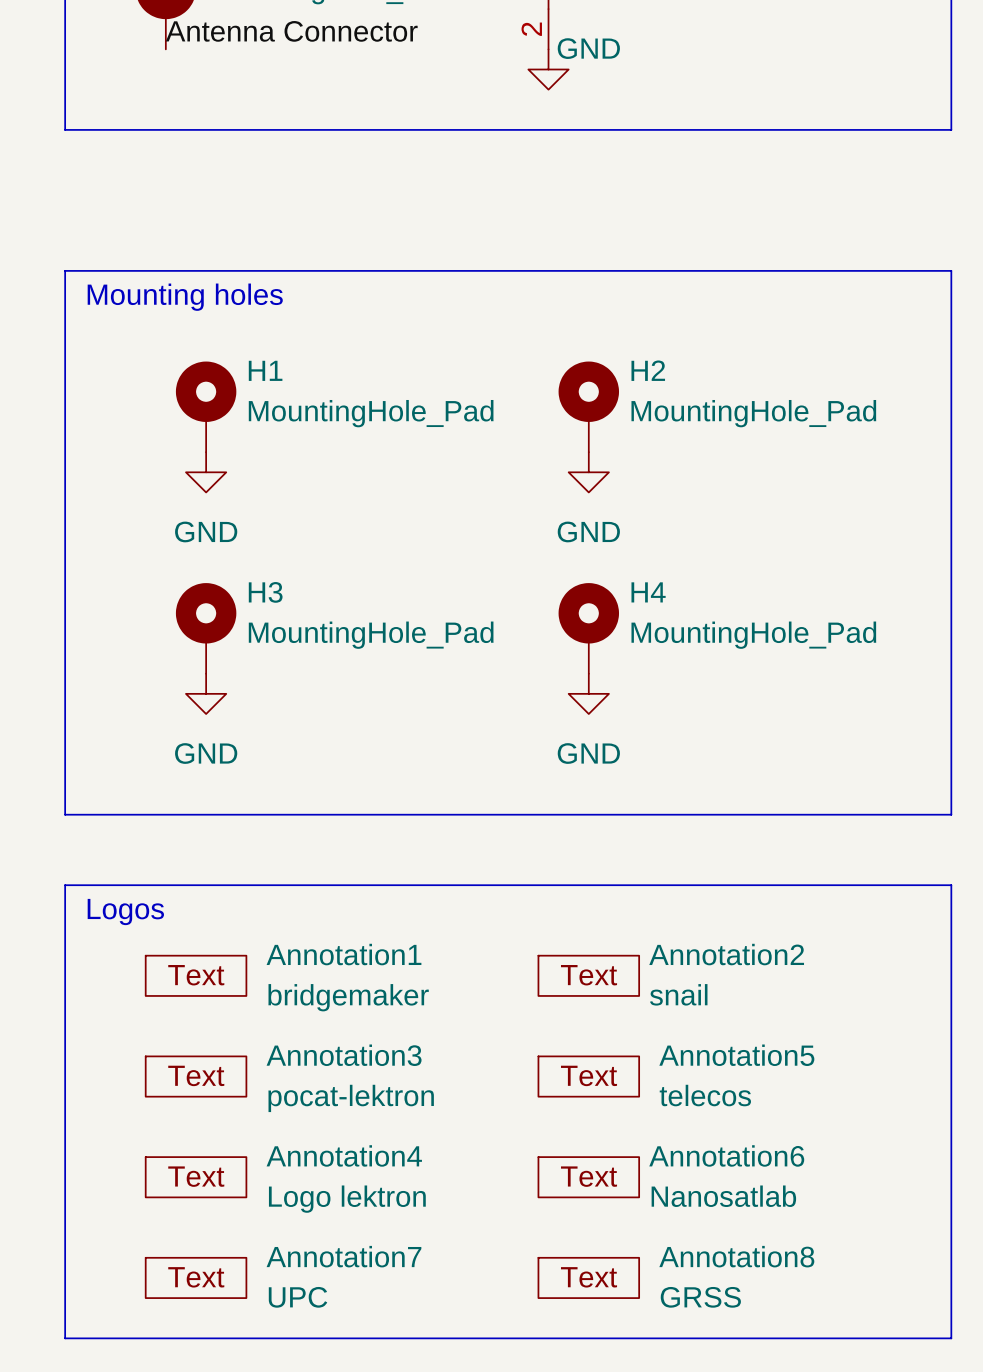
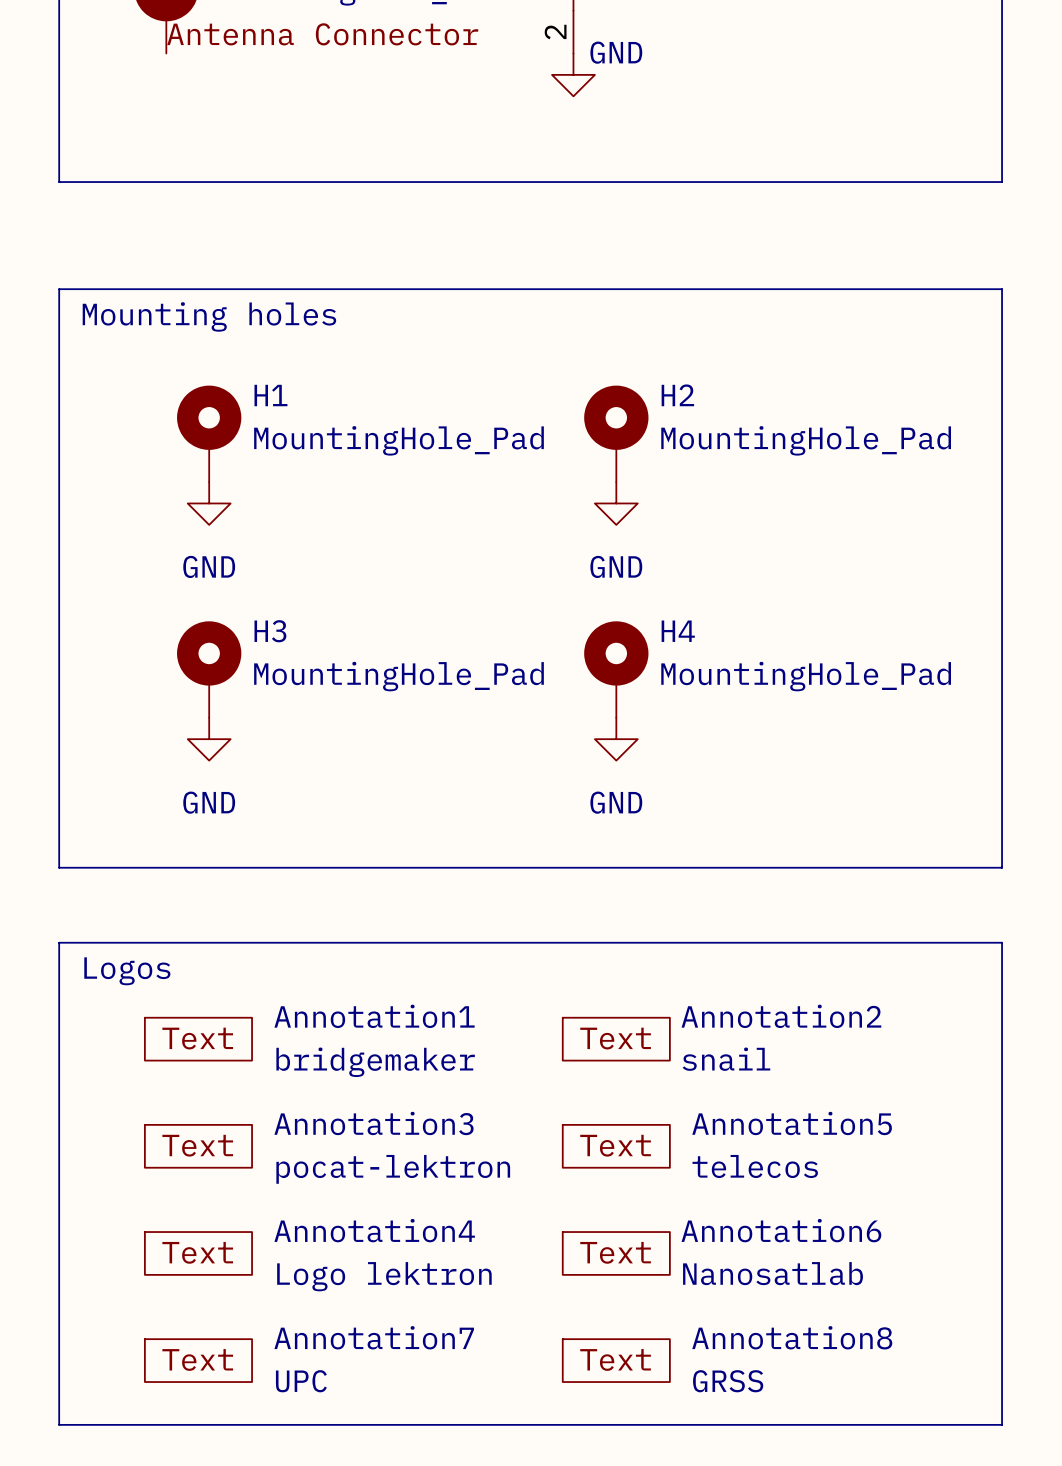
line: (65, 129) (951, 129) -> (59, 139) (59, 182) (1002, 182) (1002, 139)

